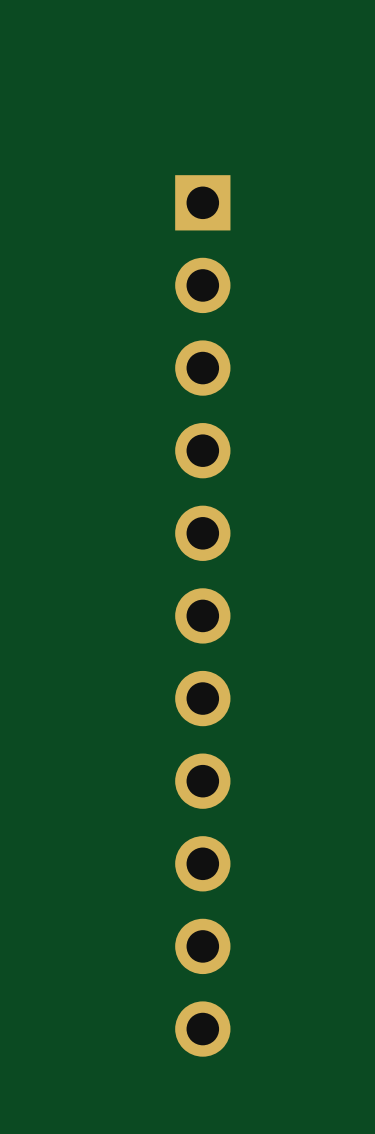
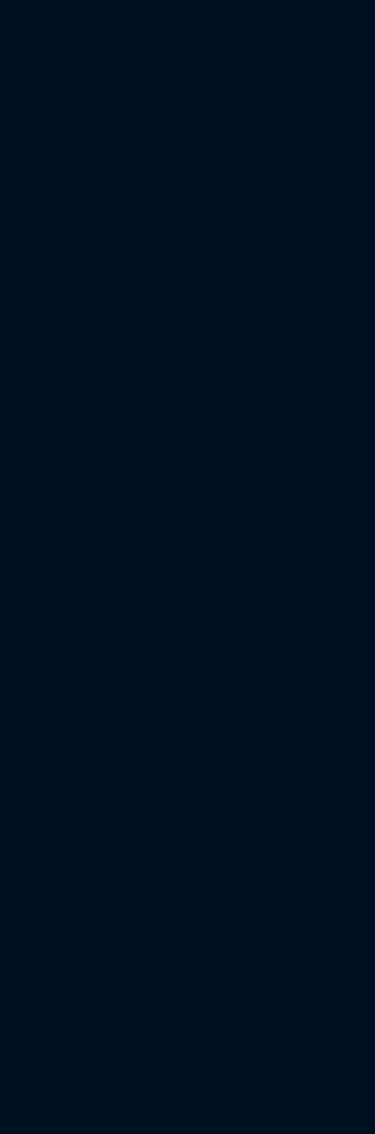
part: (202, 615) -> none

